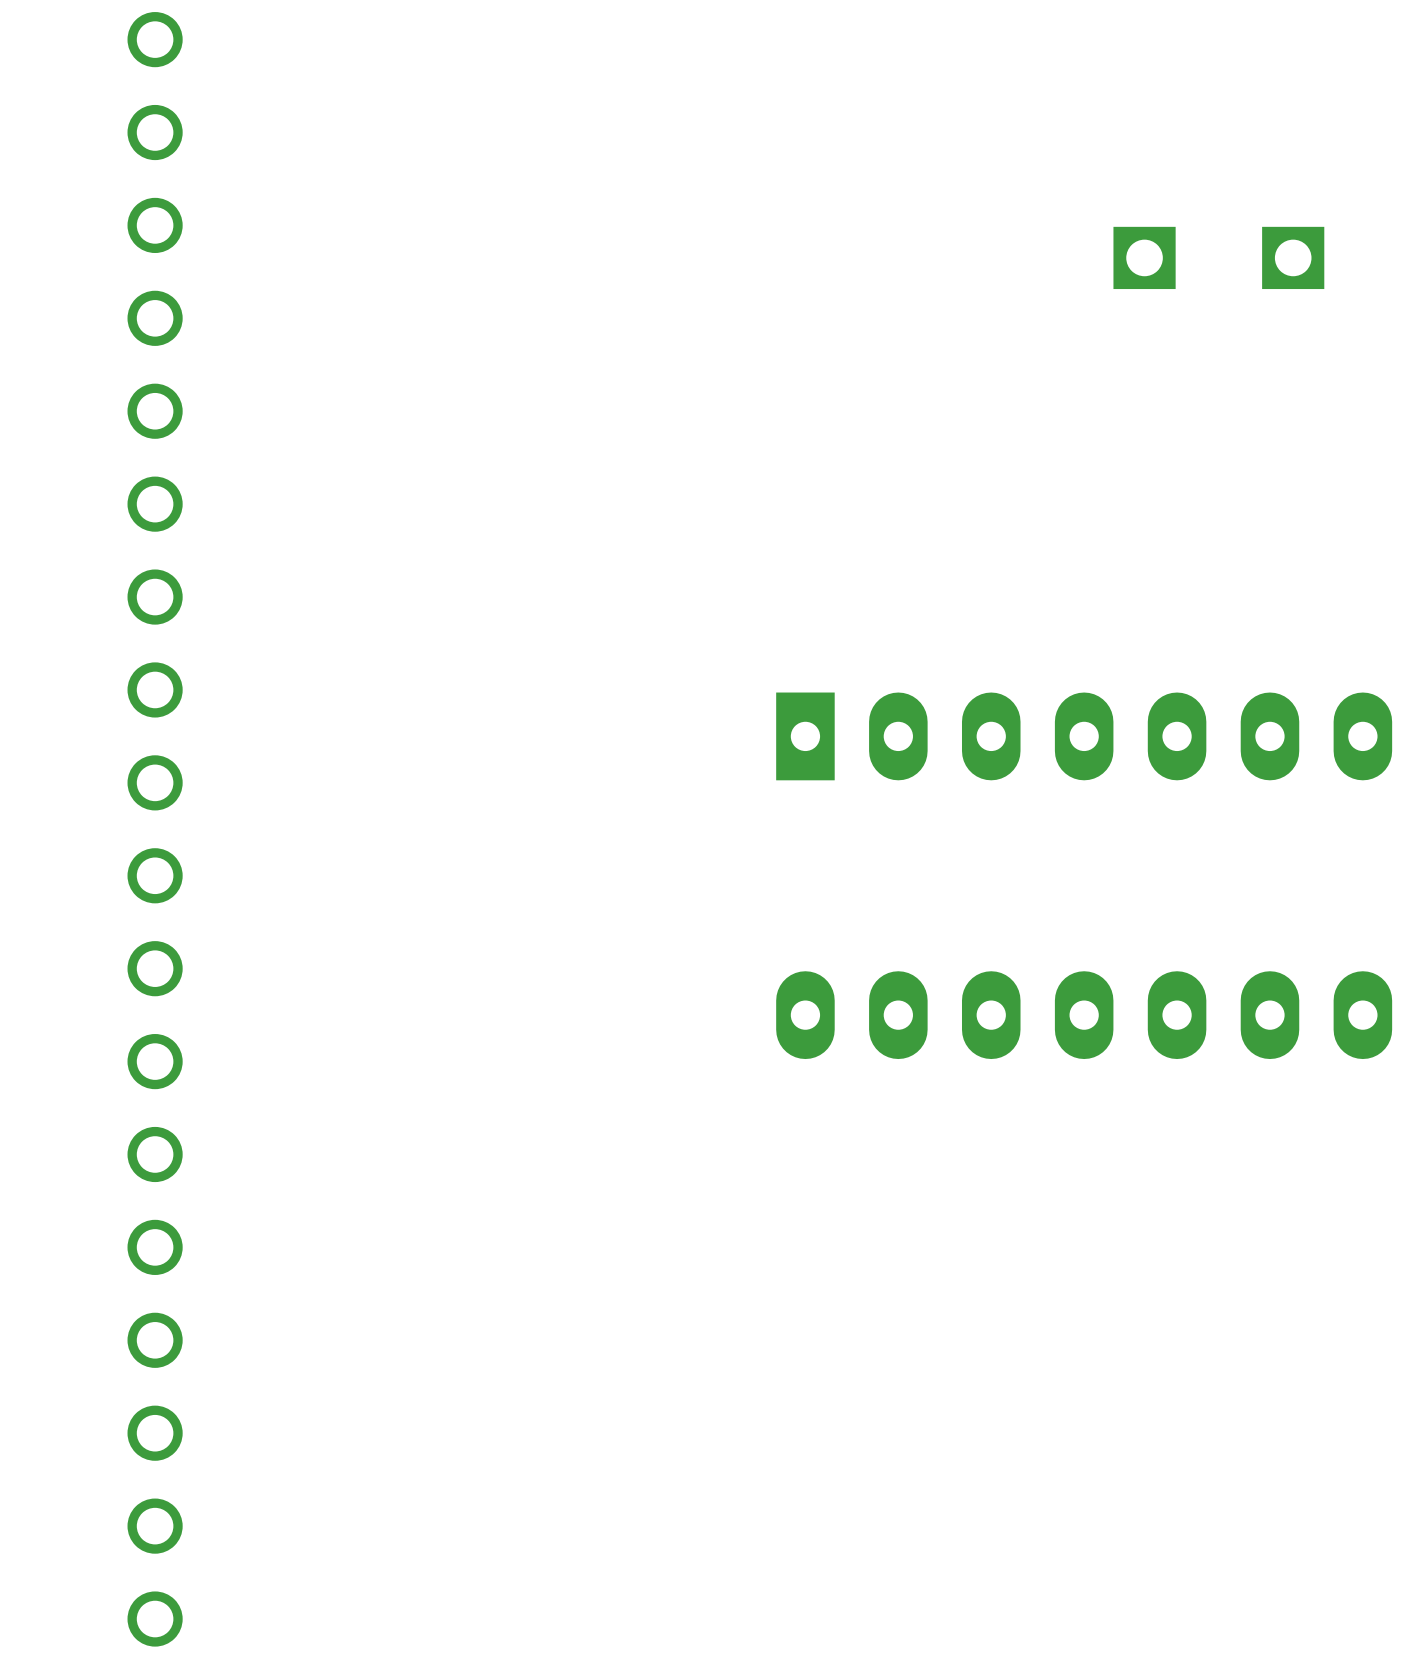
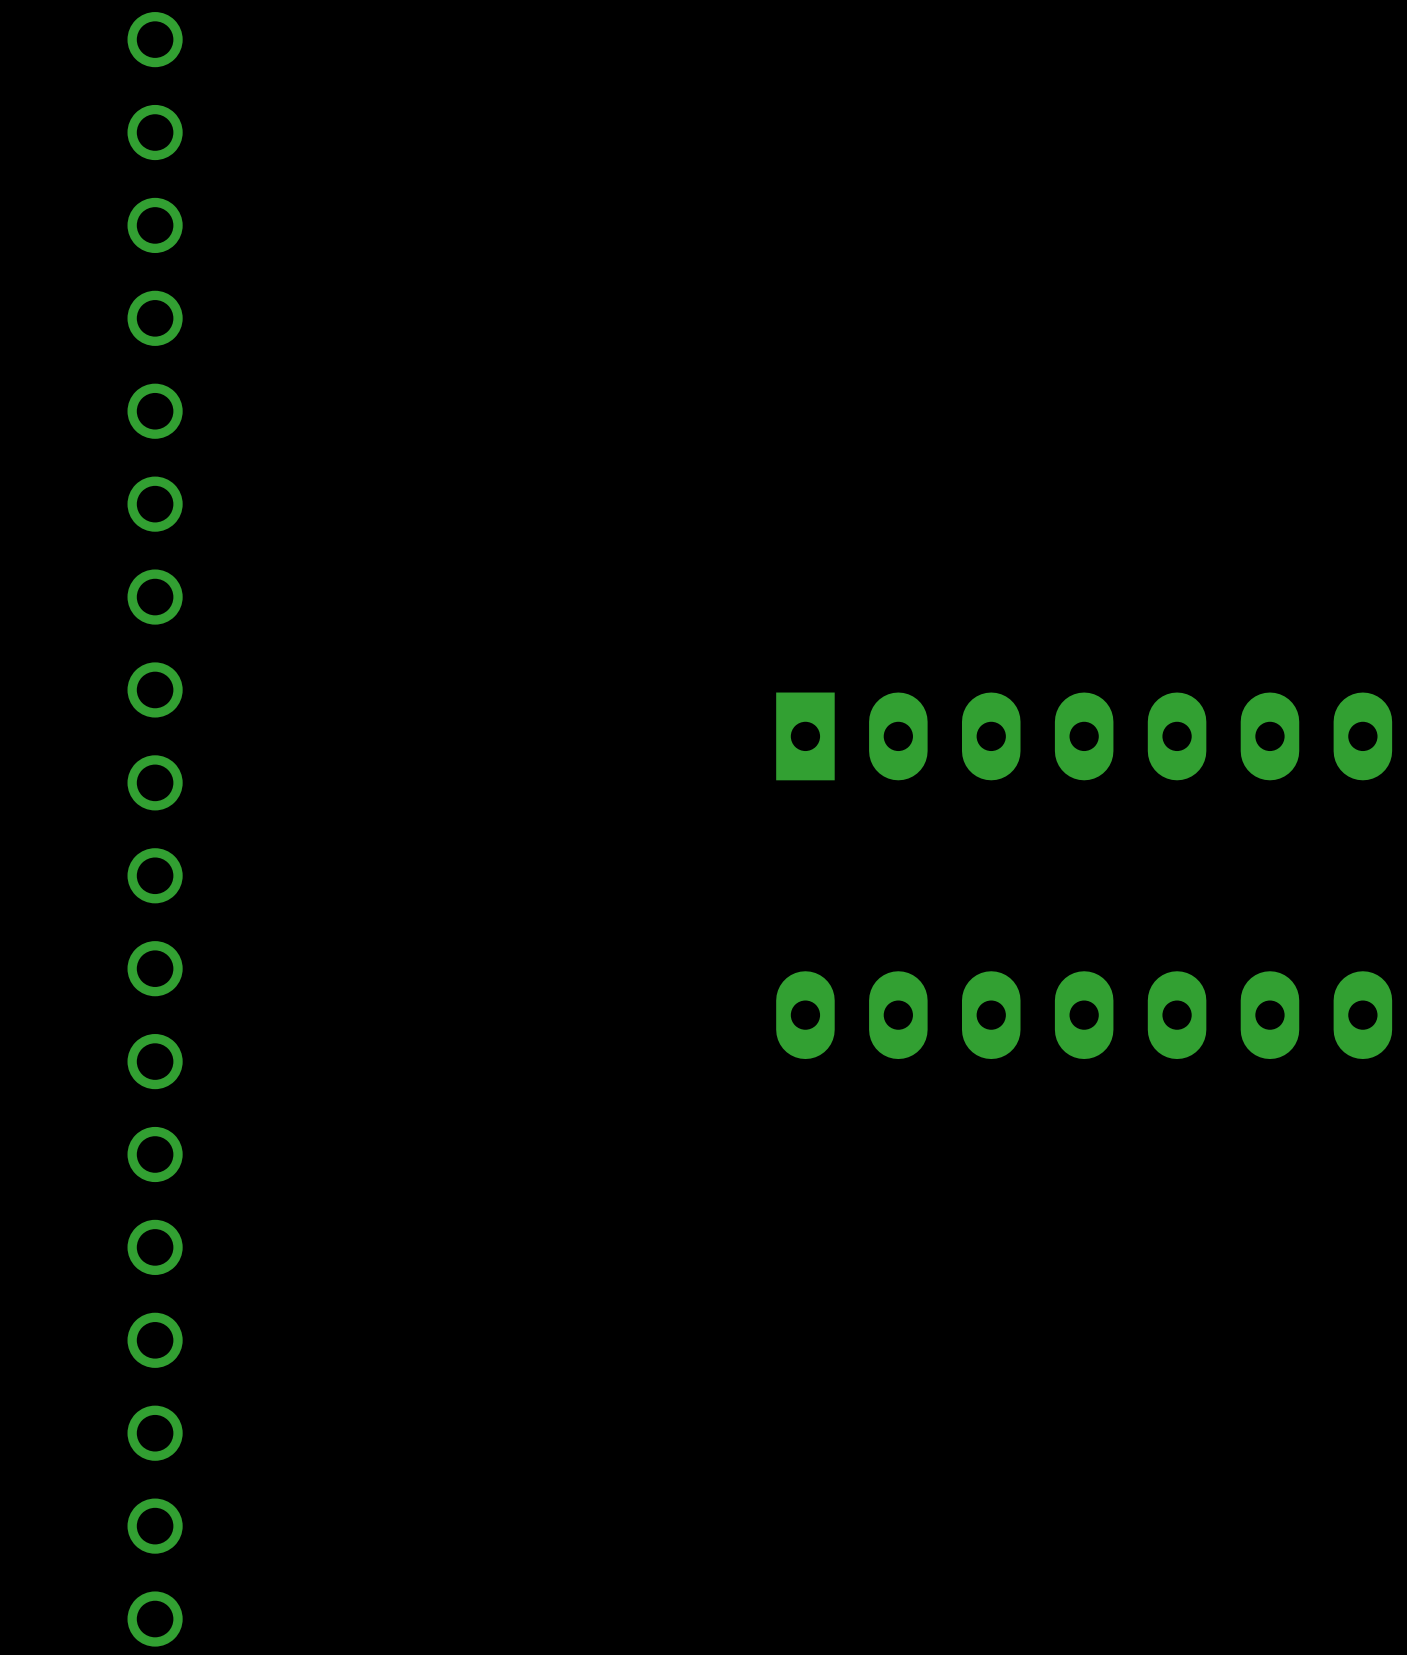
part: (1144, 257) -> none
part: (1293, 257) -> none

